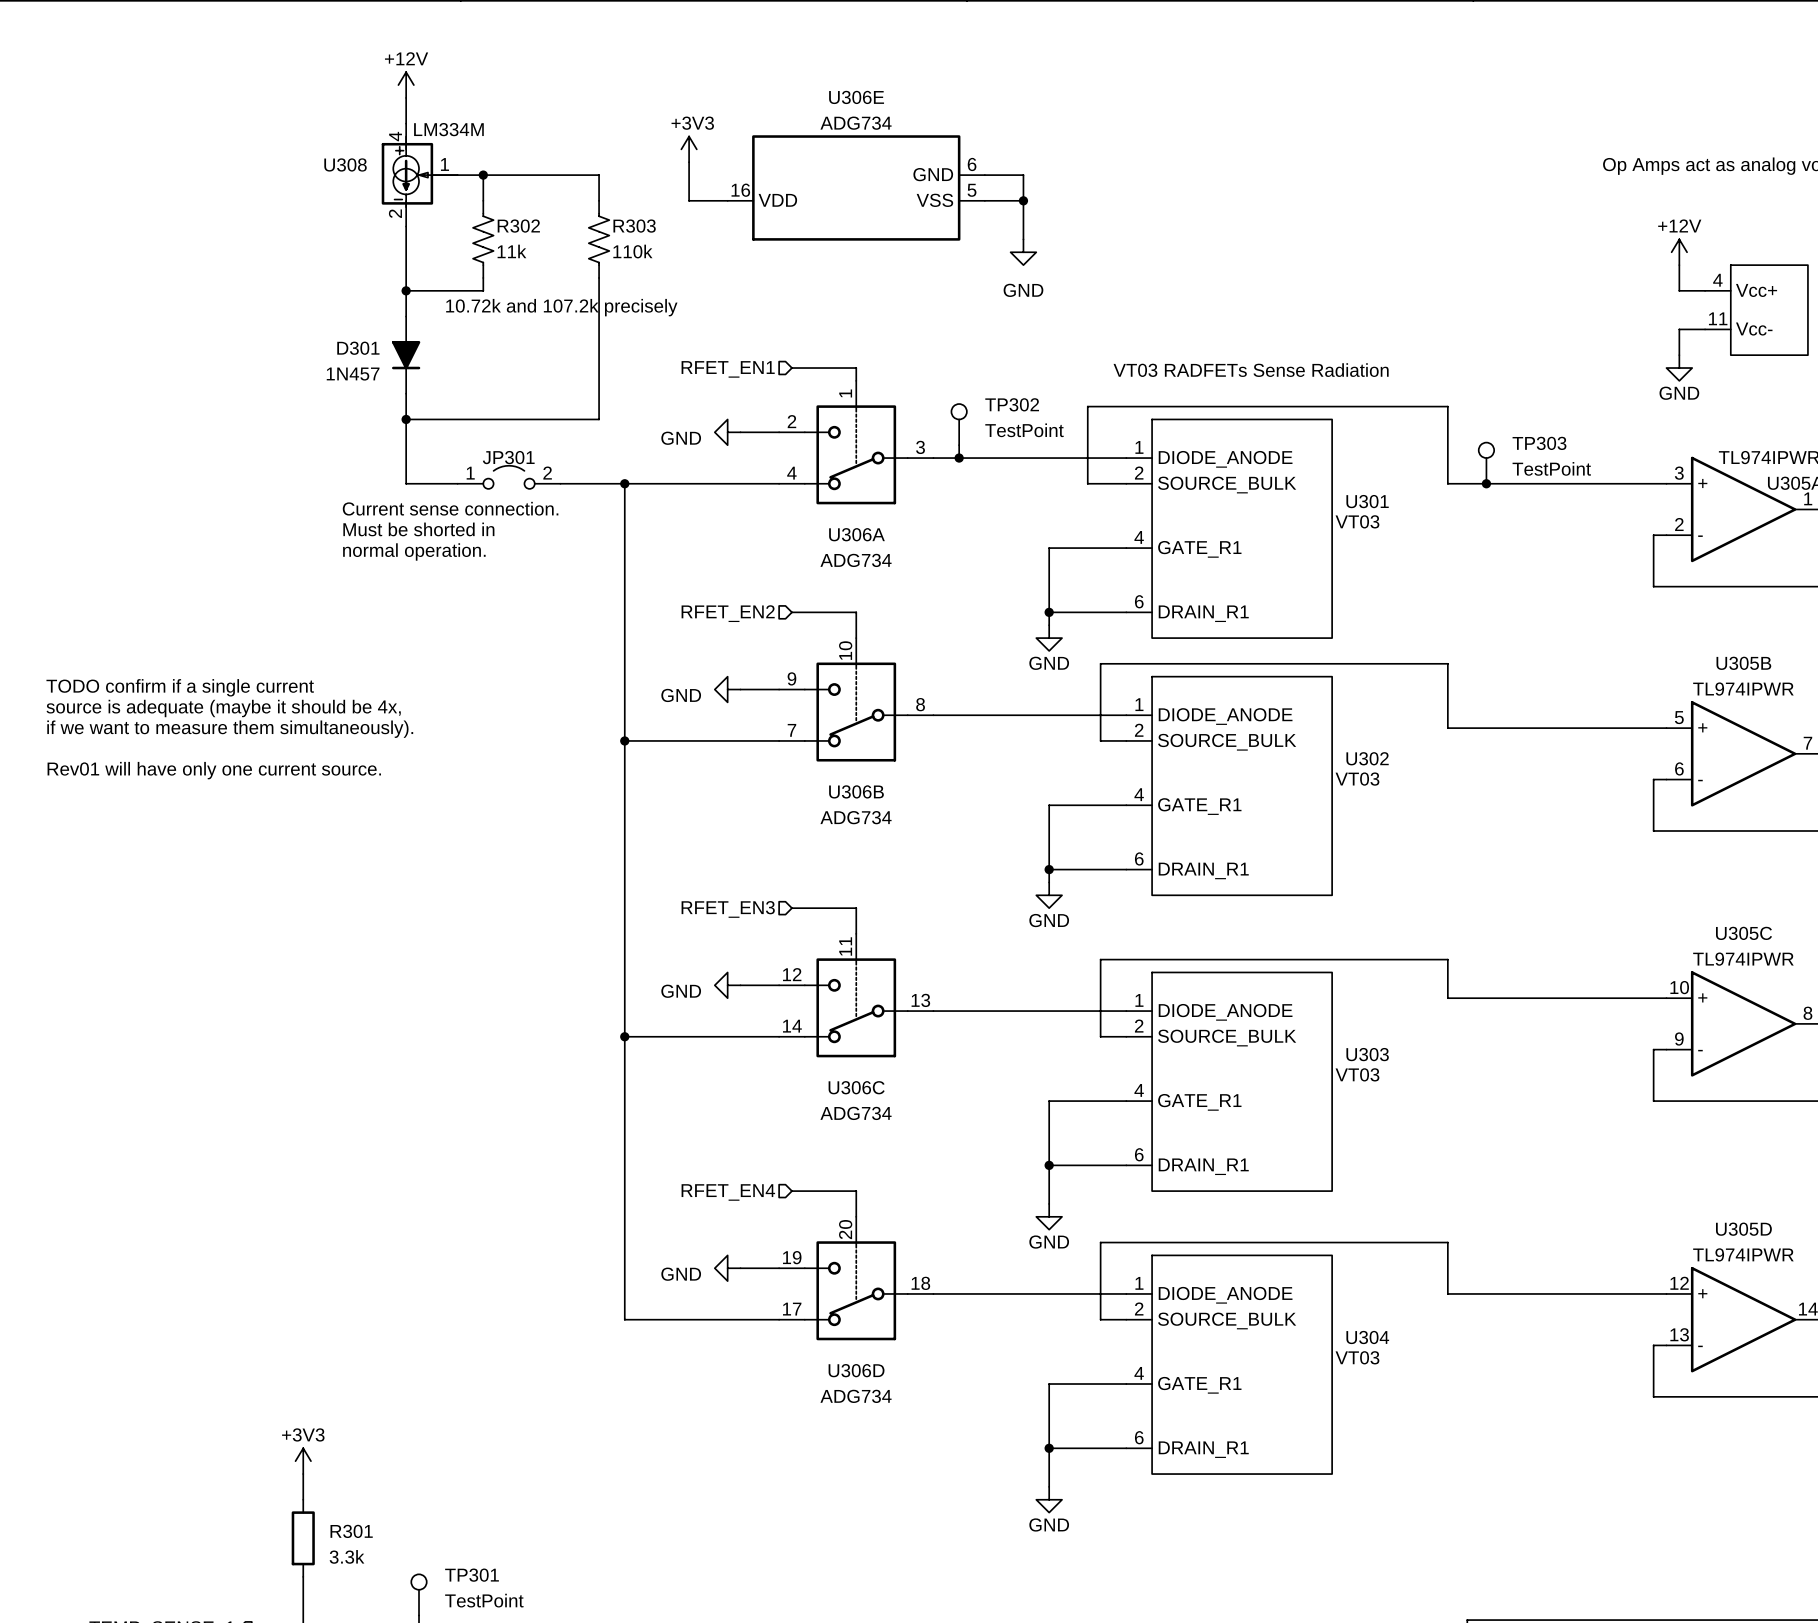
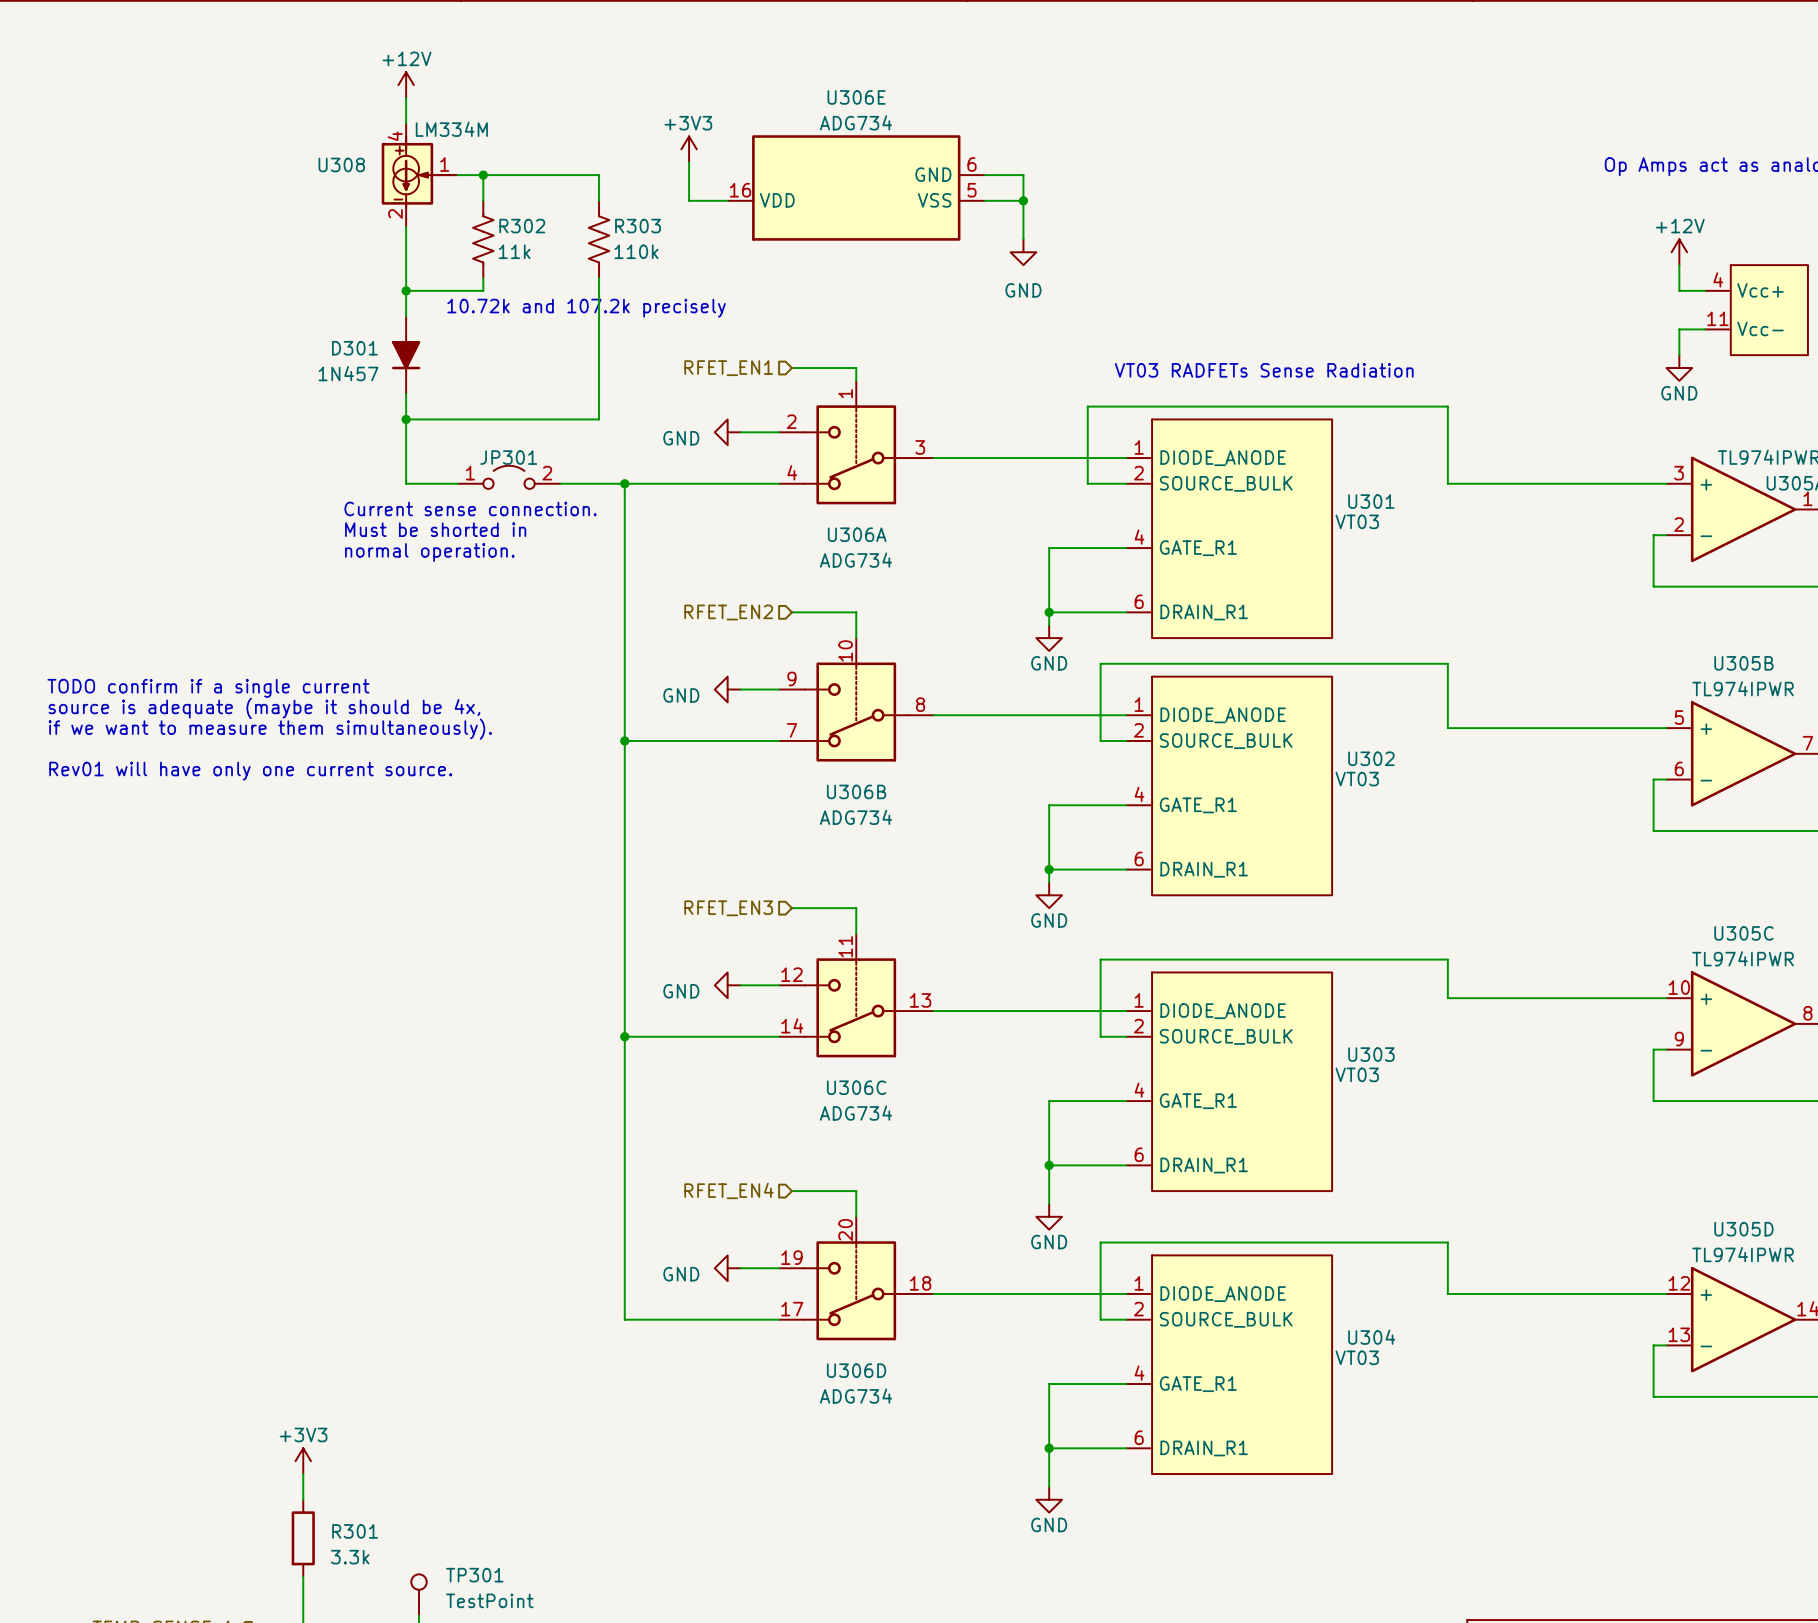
TP302: TestPoint (959, 424) -> none
wire: (959, 445) (959, 458) -> none
junction: (959, 458) -> none
TP303: TestPoint (1486, 463) -> none
junction: (1486, 483) -> none

